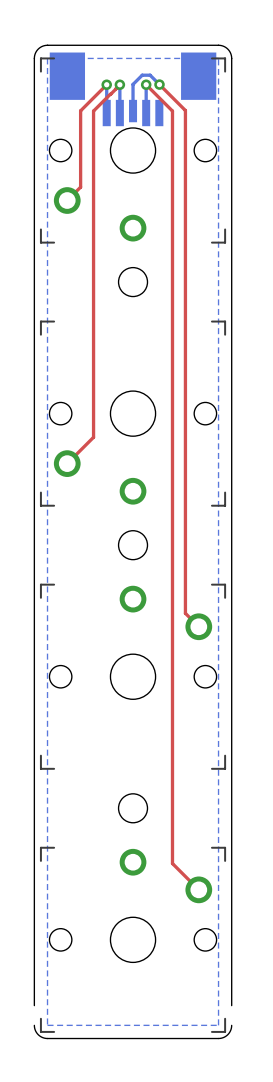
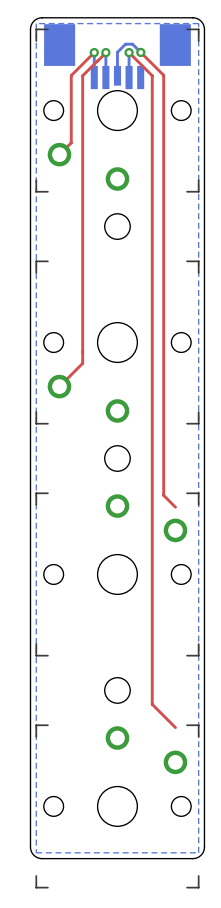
bottom zone outline: (47, 58) (47, 1025) (218, 1025) (218, 58) (47, 58) -> (36, 23) (36, 852) (198, 852) (198, 23) (36, 23)
top track: (185, 587) (185, 613) (198, 626) -> (163, 495) (175, 507)
top track: (172, 824) (172, 863) (198, 889) -> (152, 704) (175, 727)
board edge: (34, 985) (34, 1005) -> (30, 847) (33, 855) (42, 858) (194, 858) (201, 854) (204, 847)
board edge: (231, 985) (231, 1005) -> none
board edge: (34, 1025) (38, 1034) (47, 1038) (220, 1038) (228, 1033) (231, 1025) -> none

